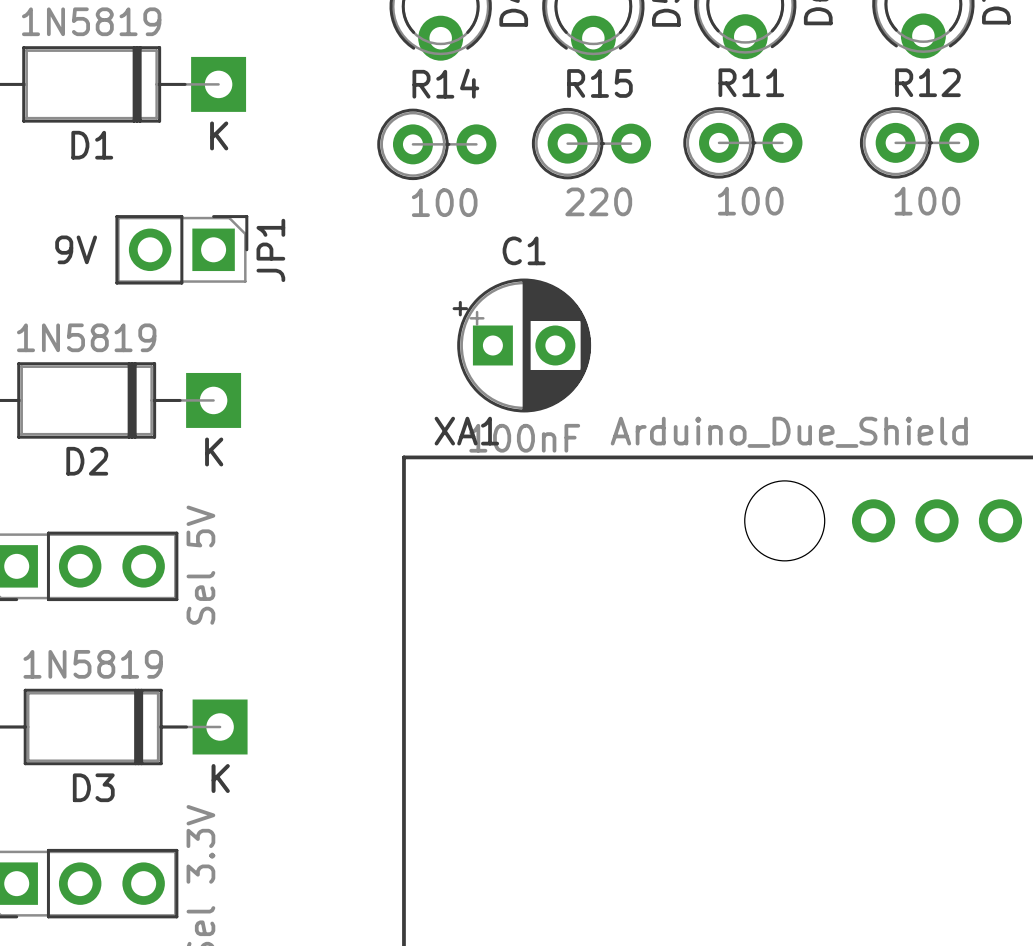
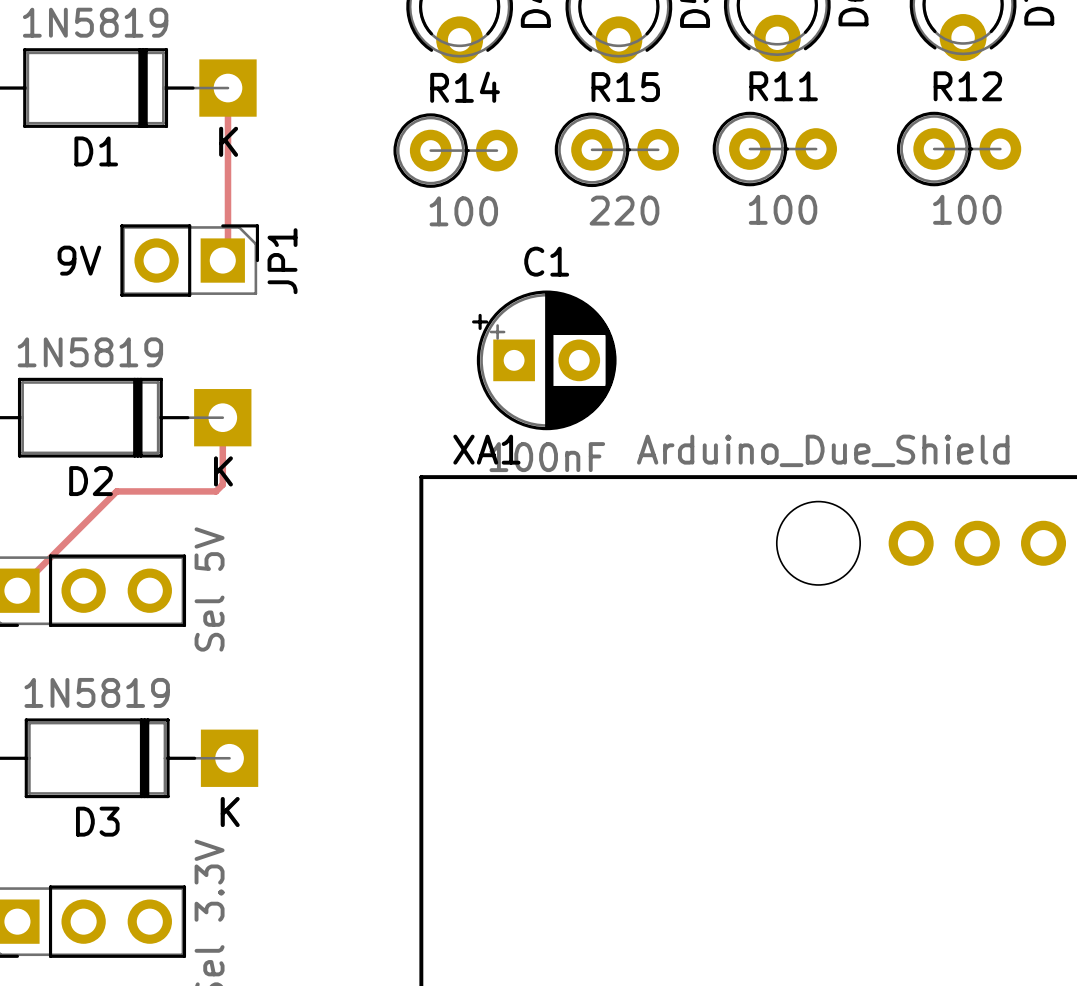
track: none -> (227, 88) (227, 255) (222, 260)
track: none -> (222, 417) (222, 484) (216, 491) (116, 491) (17, 590)

